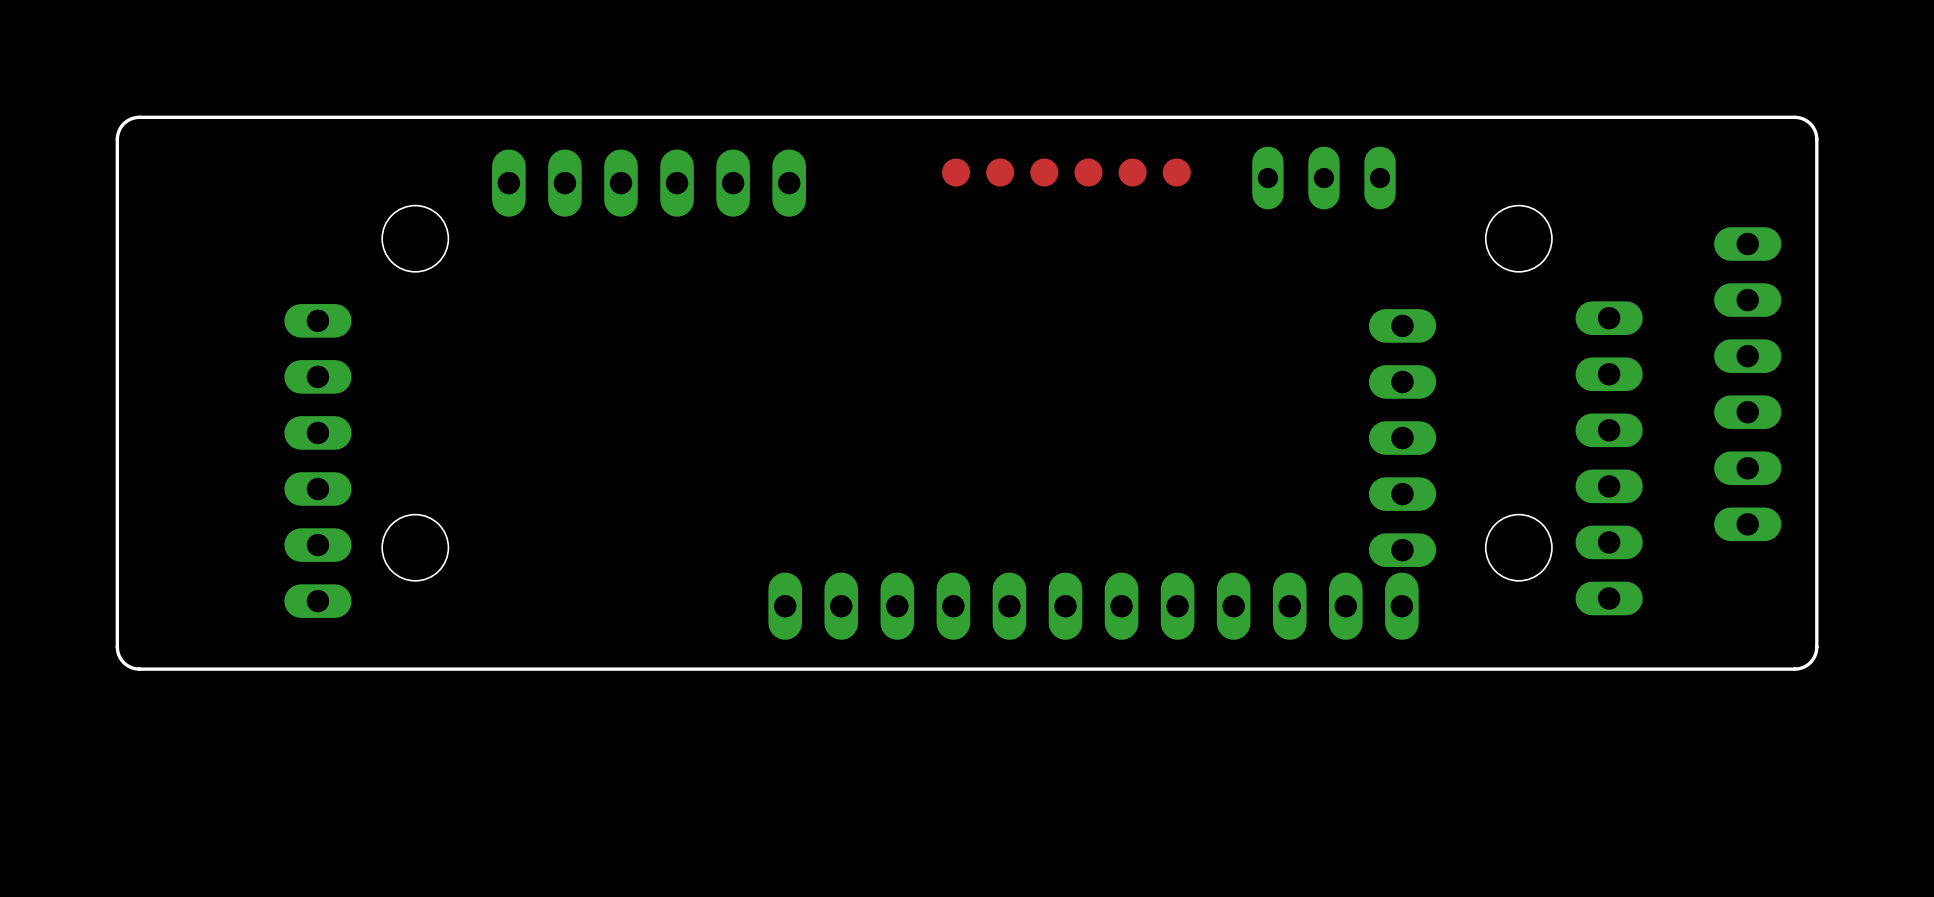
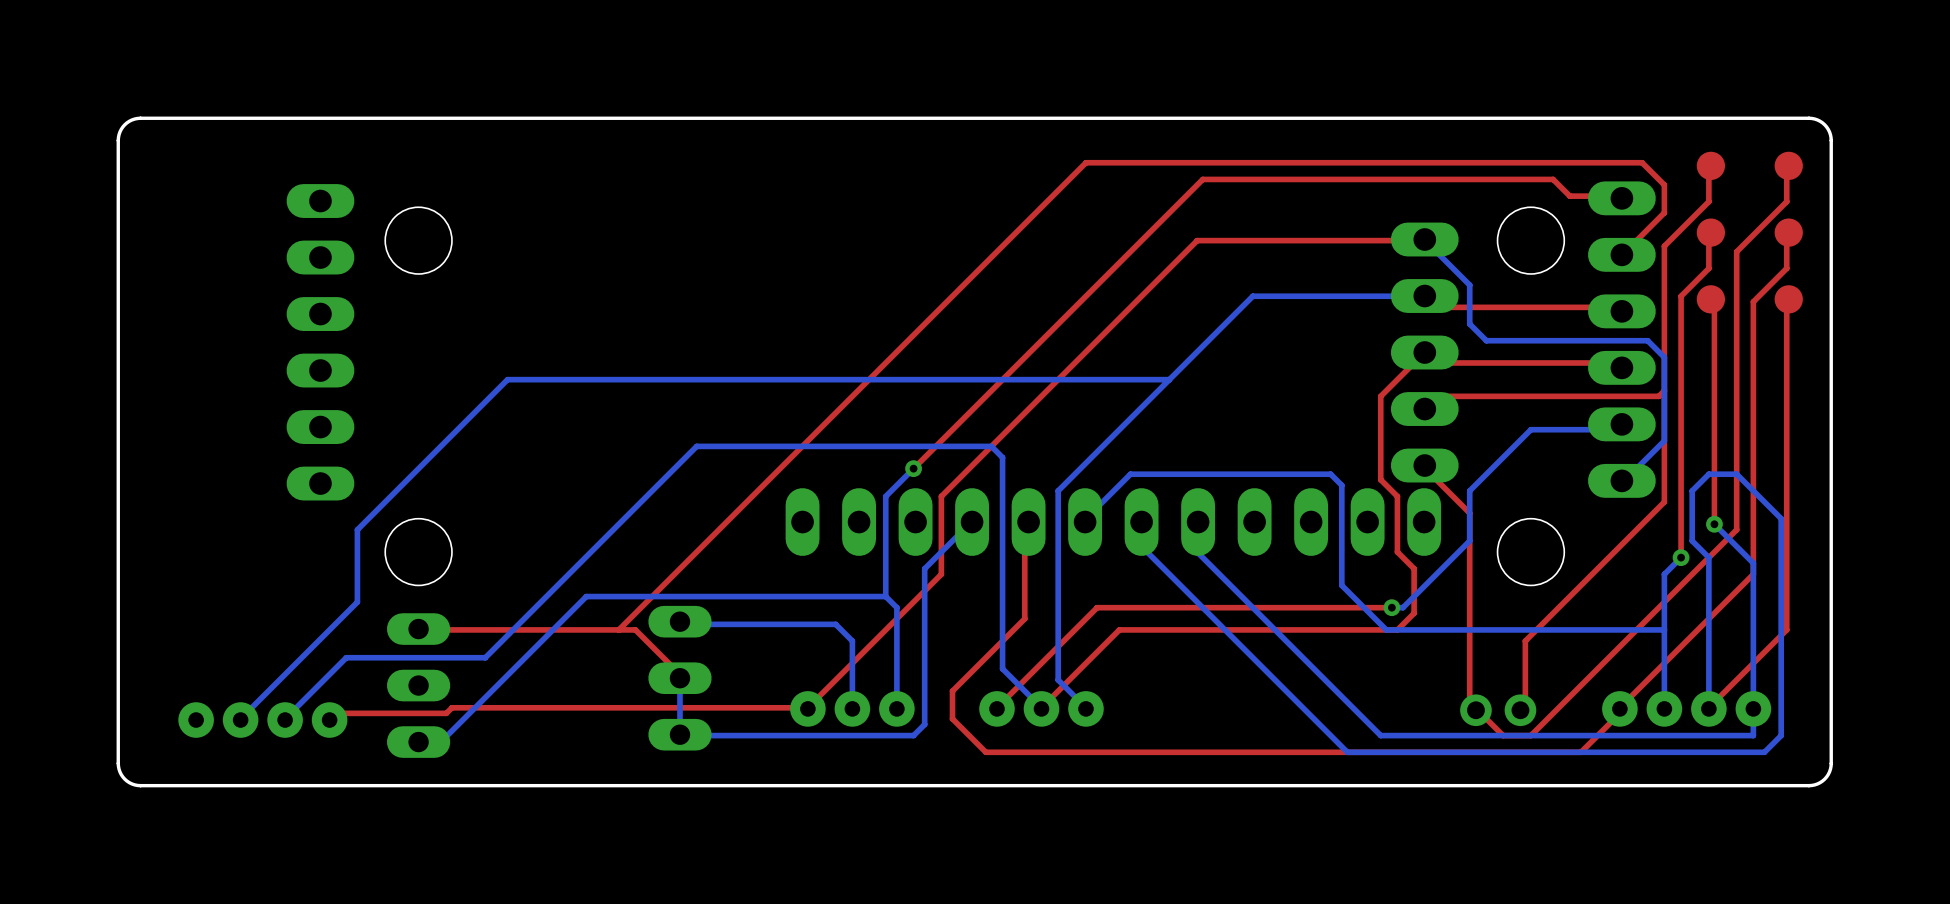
top track: none -> (1710, 165) (1708, 168) (1708, 201) (1664, 246) (1664, 502) (1525, 641) (1525, 707) (1520, 710)
part: none -> (1710, 165)
top track: none -> (1788, 165) (1786, 168) (1786, 201) (1736, 251) (1736, 529) (1530, 735) (1503, 735) (1469, 702) (1469, 513) (1425, 468) (1424, 465)
part: none -> (1788, 165)
part: (956, 172) -> none
part: (1000, 172) -> none
part: (1044, 172) -> none
part: (1088, 172) -> none
part: (1132, 172) -> none
part: (1176, 172) -> none
part: (1323, 178) -> none
part: (649, 183) -> none
top track: none -> (1621, 198) (1619, 196) (1569, 196) (1553, 179) (1202, 179) (913, 468)
top track: none -> (1710, 232) (1708, 235) (1708, 268) (1681, 296) (1681, 557)
part: none -> (1710, 232)
top track: none -> (1788, 232) (1786, 235) (1786, 268) (1753, 301) (1753, 574) (1619, 707) (1619, 713) (1580, 752) (985, 752) (952, 718) (952, 691) (1024, 618) (1024, 524) (1028, 522)
part: none -> (1788, 232)
bottom track: none -> (1424, 239) (1469, 285) (1469, 324) (1486, 340) (1647, 340) (1664, 357) (1664, 440) (1625, 479) (1621, 480)
top track: none -> (1424, 239) (1197, 240) (941, 496) (941, 574) (807, 707)
top track: none -> (1621, 254) (1664, 212) (1664, 185) (1642, 162) (1085, 162) (618, 629)
bottom track: none -> (1424, 296) (1252, 296) (1058, 490) (1058, 679) (1085, 708)
top track: none -> (1424, 296) (1436, 307) (1619, 307) (1621, 311)
top track: none -> (1710, 299) (1714, 301) (1714, 524)
part: none -> (1710, 299)
top track: none -> (1788, 299) (1786, 301) (1786, 629) (1708, 708)
part: none -> (1788, 299)
part: none -> (1621, 339)
top track: none -> (1621, 367) (1619, 362) (1430, 362) (1425, 357) (1424, 352) (1380, 396) (1380, 479) (1397, 496) (1397, 552) (1414, 568) (1414, 613) (1397, 629) (1119, 629) (1041, 708)
bottom track: none -> (1169, 379) (507, 379) (357, 529) (357, 602) (240, 720)
part: (1747, 384) -> none
top track: none -> (1664, 390) (1658, 396) (1436, 396) (1424, 409)
bottom track: none -> (1621, 424) (1619, 429) (1530, 429) (1469, 490) (1469, 540) (1402, 607) (1391, 607)
part position: (1402, 438) -> (1424, 352)
part: (1609, 458) -> none
part position: (317, 460) -> (320, 342)
bottom track: none -> (913, 468) (885, 496) (885, 596)
via: none -> (913, 468)
bottom track: none -> (972, 522) (924, 568) (924, 724) (913, 735) (679, 735) (679, 678)
bottom track: none -> (1085, 522) (1085, 518) (1130, 474) (1330, 474) (1341, 485) (1341, 585) (1386, 629) (1664, 629)
bottom track: none -> (1141, 522) (1141, 546) (1347, 752) (1764, 752) (1781, 735) (1781, 518) (1736, 474) (1708, 474) (1692, 490) (1692, 540) (1708, 557) (1708, 708)
bottom track: none -> (1198, 522) (1198, 552) (1380, 735) (1753, 735) (1753, 563) (1714, 524)
via: none -> (1714, 524)
bottom track: none -> (1681, 557) (1664, 574) (1664, 708)
via: none -> (1681, 557)
bottom track: none -> (885, 596) (586, 596) (440, 742) (418, 742)
bottom track: none -> (885, 596) (896, 607) (896, 708)
top track: none -> (1391, 607) (1097, 607) (996, 708)
via: none -> (1391, 607)
part position: (1093, 606) -> (1113, 522)
bottom track: none -> (679, 621) (679, 624) (835, 624) (852, 641) (852, 708)
top track: none -> (418, 629) (635, 629) (679, 674) (679, 678)
board edge: (1816, 647) (1815, 655) (1810, 662) (1803, 667) (1794, 669) (139, 669) (130, 667) (123, 662) (119, 655) (117, 647) -> (1831, 652) (1831, 766) (1828, 774) (1822, 781) (1808, 785) (137, 785) (124, 779) (118, 766) (118, 652)
part: none -> (679, 678)
part: none -> (418, 685)
top track: none -> (807, 707) (451, 707) (446, 713) (335, 713) (329, 720)
part: none -> (852, 708)
bottom track: none -> (1041, 708) (1002, 668) (1002, 457) (991, 446) (696, 446) (485, 657) (346, 657) (285, 720)
part: none -> (1041, 708)
part: none -> (1686, 708)
part: none -> (1498, 710)
part: none -> (262, 720)

